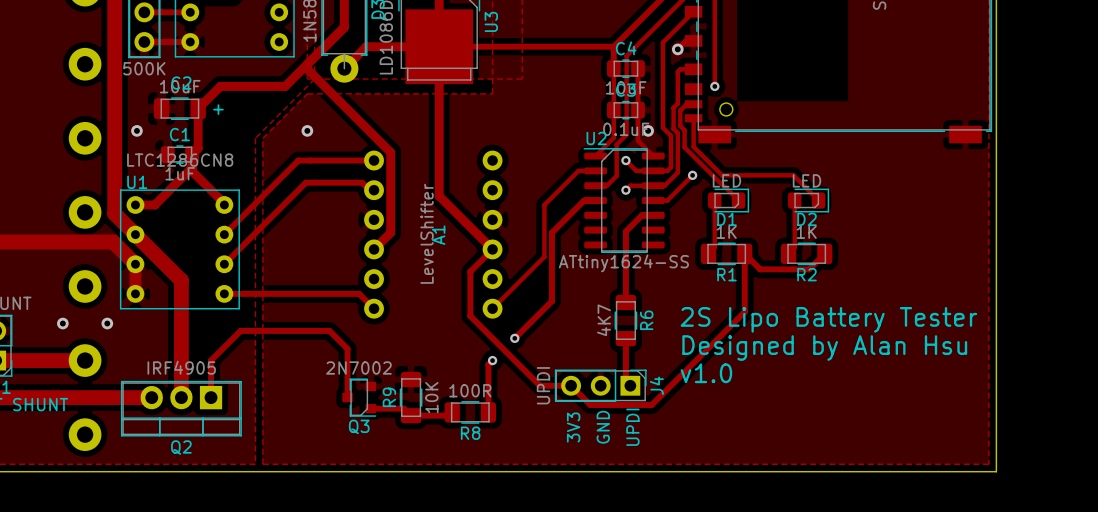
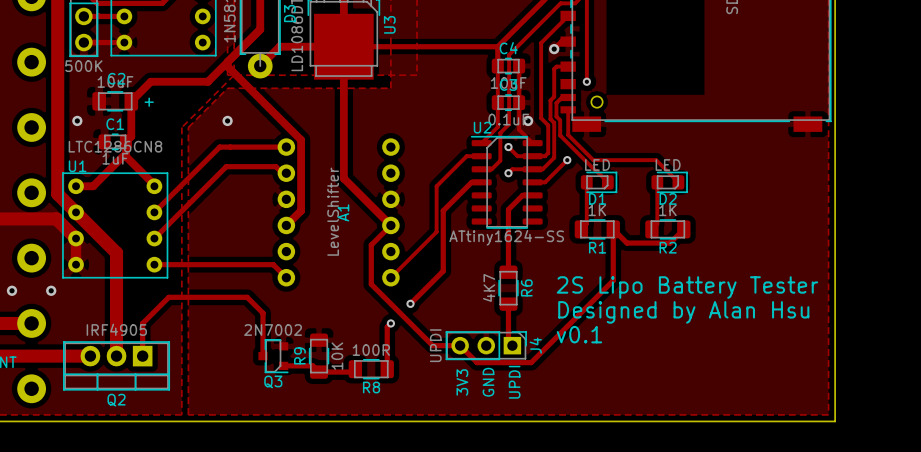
text: v1.0 (706, 373) -> v0.1 (579, 334)

